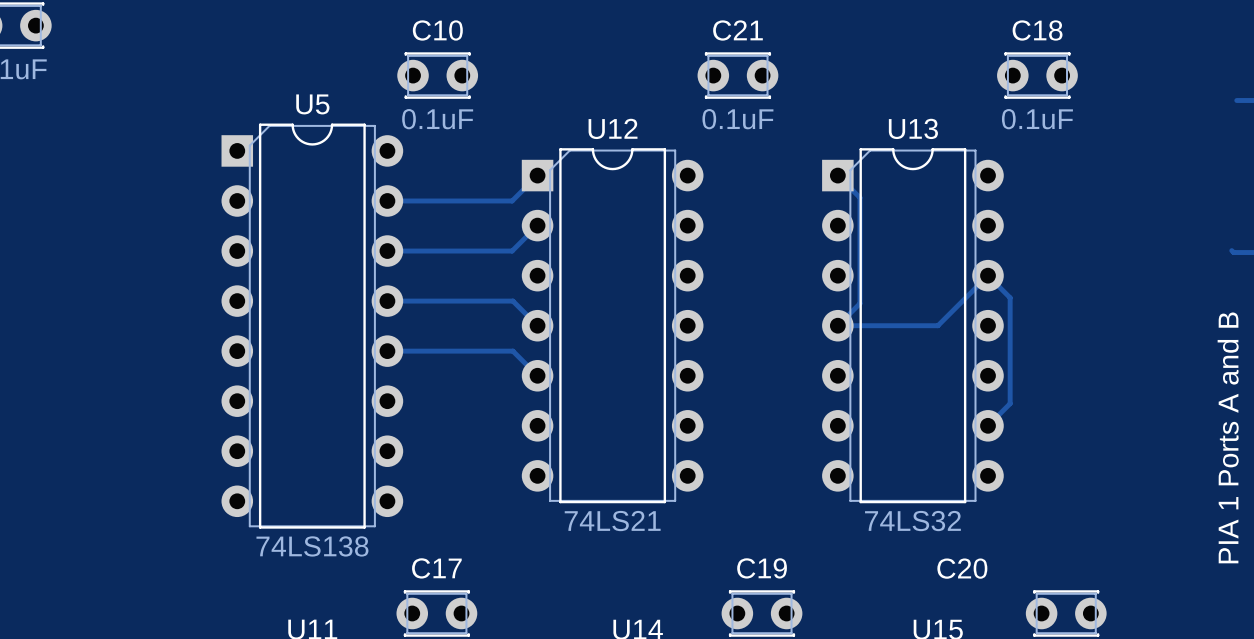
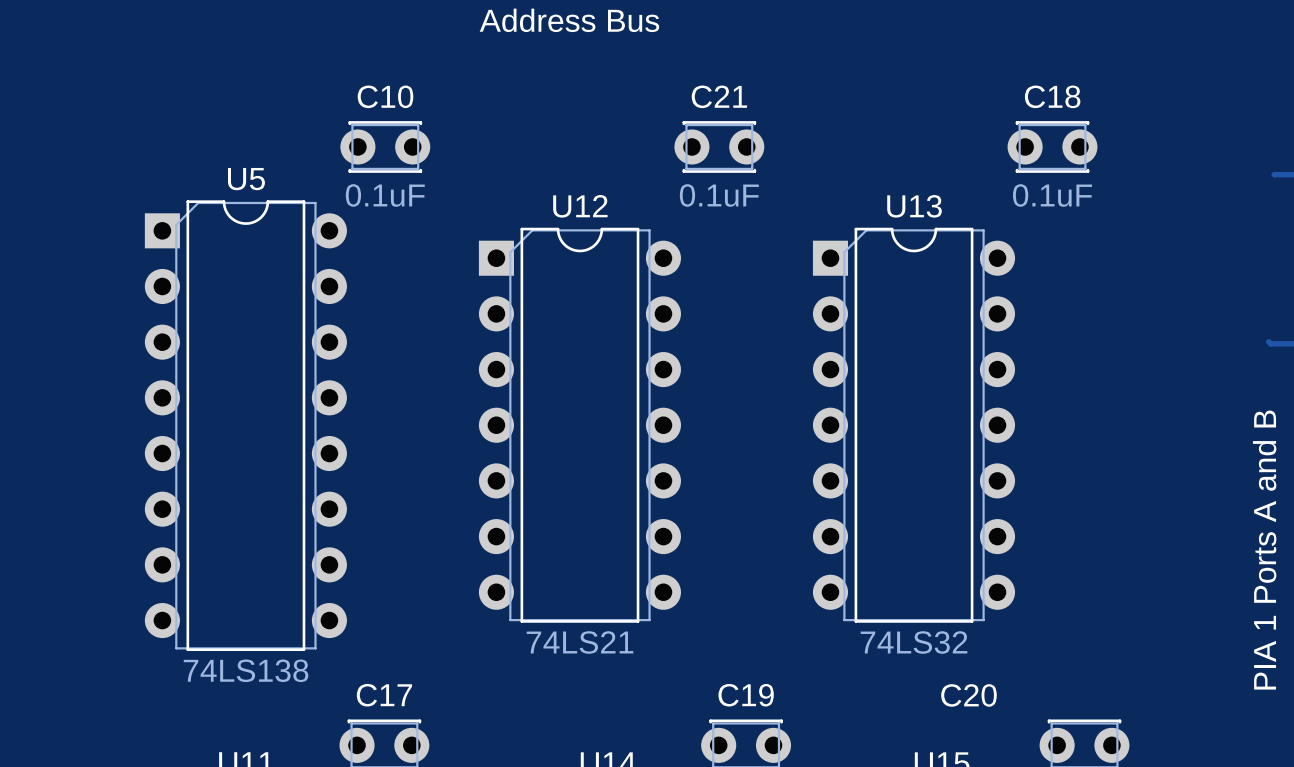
track: (537, 175) (512, 200) (387, 200) -> none
track: (837, 175) (860, 197) (860, 303) (837, 325) (937, 325) (988, 275) (1010, 297) (1010, 403) (988, 425) -> none
track: (537, 225) (512, 251) (387, 251) -> none
track: (387, 301) (512, 301) (537, 325) -> none
track: (387, 351) (512, 351) (537, 375) -> none

